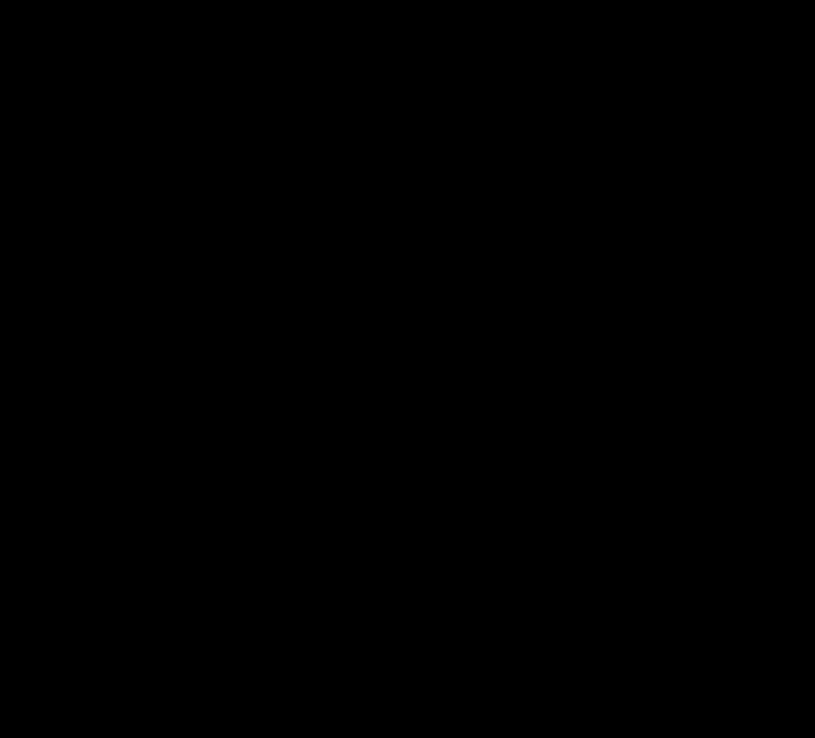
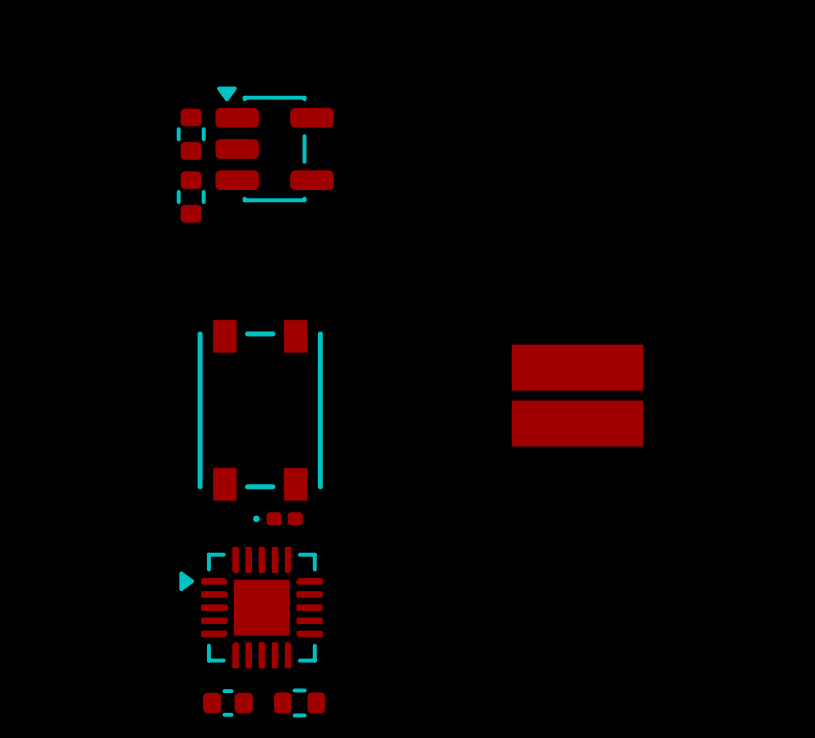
part: none -> (191, 134)
part: none -> (274, 144)
part: none -> (191, 196)
part: none -> (577, 367)
part: none -> (260, 410)
part: none -> (577, 423)
part: none -> (277, 518)
part: none -> (250, 607)
part: none -> (227, 702)
part: none -> (299, 702)

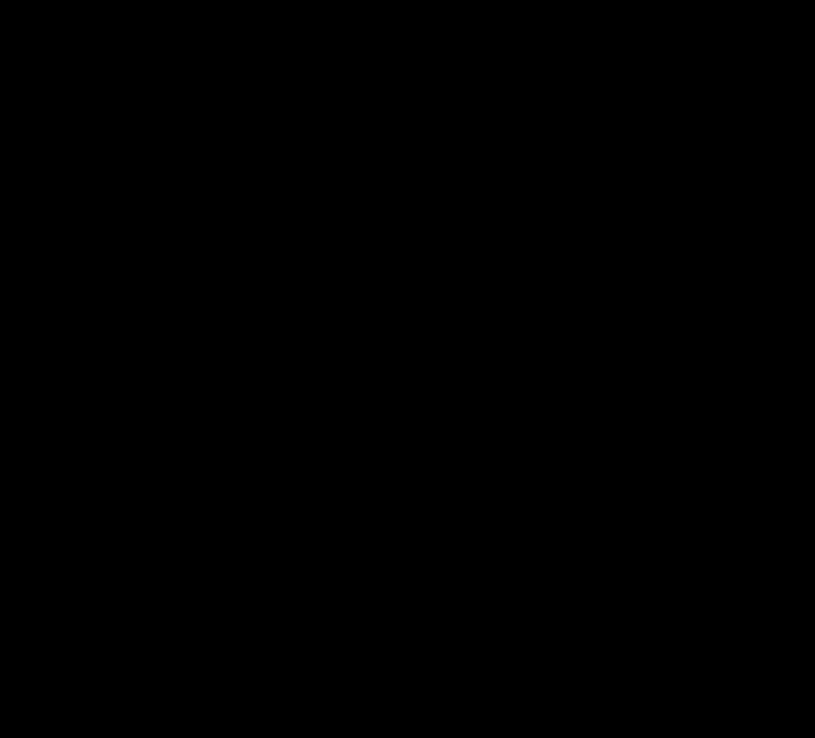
part: (191, 134) -> none
part: (274, 144) -> none
part: (191, 196) -> none
part: (577, 367) -> none
part: (260, 410) -> none
part: (577, 423) -> none
part: (277, 518) -> none
part: (250, 607) -> none
part: (227, 702) -> none
part: (299, 702) -> none

